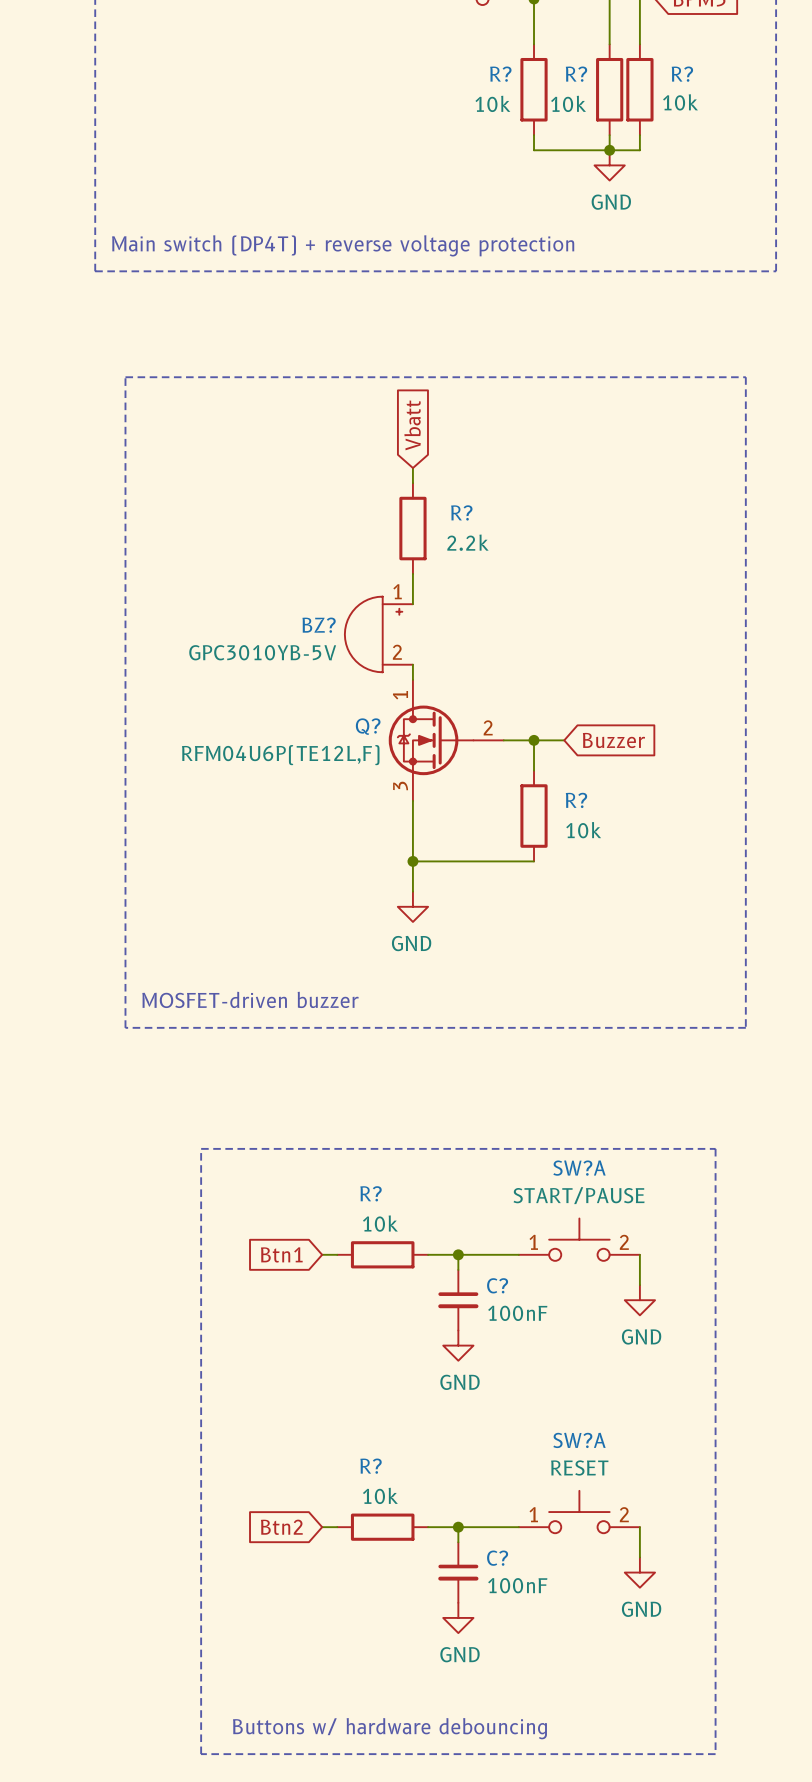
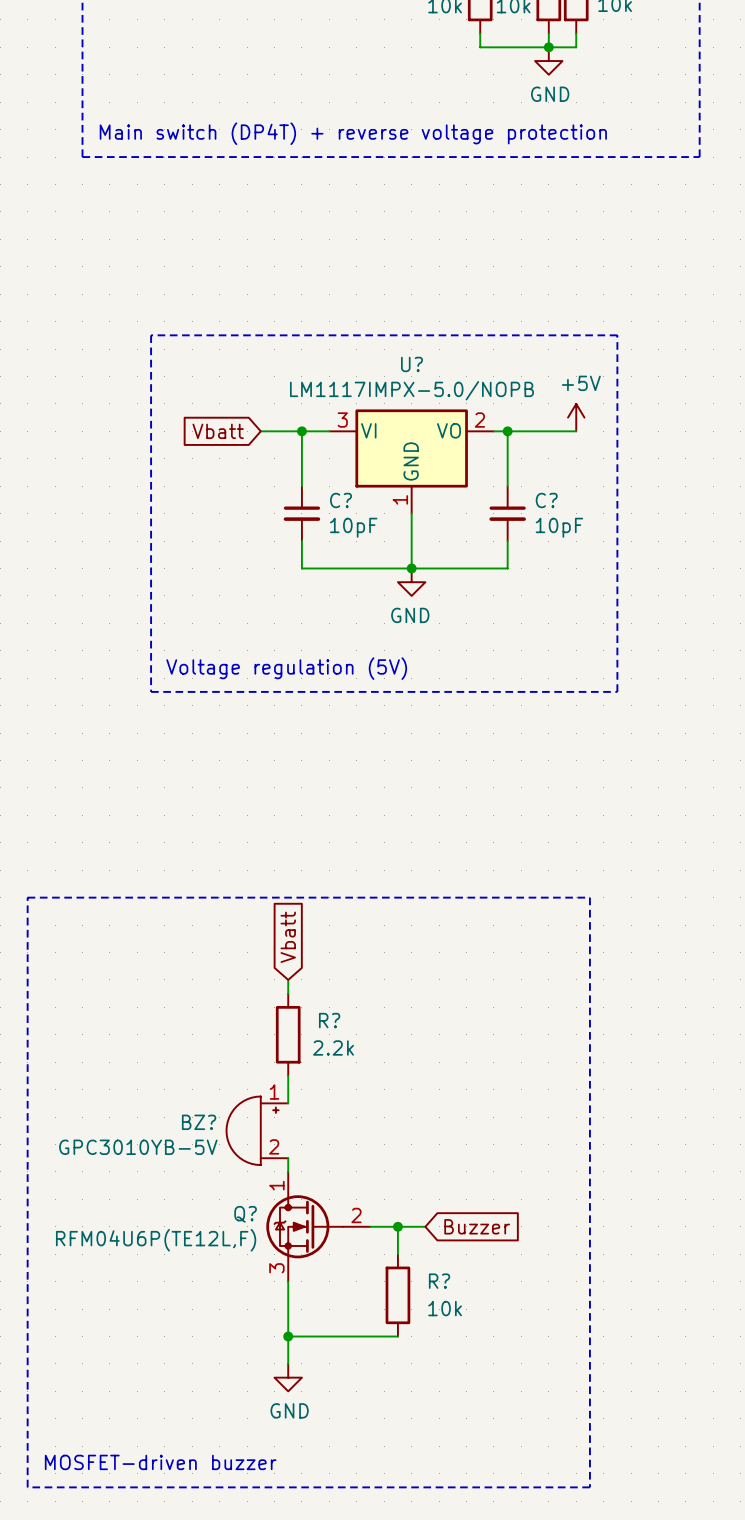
line: (125, 377) (125, 1027) (745, 1027) (745, 377) (125, 377) -> (151, 335) (151, 691) (617, 691) (617, 335) (151, 335)
global label rotation: 0° (412, 425) -> 90° counterclockwise (218, 431)
global label position: Vbatt (412, 425) -> Vbatt (218, 431)
wire: (412, 468) (412, 483) -> none
R?: 2.2k (412, 528) -> none
power symbol: none -> +5V (576, 417)
wire: none -> (260, 431) (329, 431)
wire: none -> (301, 431) (301, 486)
junction: none -> (301, 431)
wire: none -> (493, 431) (576, 431)
wire: none -> (507, 431) (507, 486)
junction: none -> (507, 431)
U?: none -> LM1117IMPX-5.0/NOPB (411, 461)
BZ?: GPC3010YB-5V (378, 634) -> none
C?: none -> 10pF (301, 513)
wire: (412, 664) (412, 679) -> none
wire: none -> (411, 513) (411, 568)
C?: none -> 10pF (507, 513)
wire: none -> (301, 541) (301, 568) (507, 568) (507, 541)
junction: none -> (411, 568)
Q?: RFM04U6P(TE12L,F) (446, 740) -> none
wire: (503, 740) (564, 740) -> none
wire: (534, 740) (534, 770) -> none
junction: (534, 740) -> none
global label: Buzzer (613, 740) -> none
wire: (412, 800) (412, 891) -> none
R?: 10k (534, 816) -> none
text: none -> Voltage regulation (5V) (286, 668)
junction: (412, 861) -> none
power symbol position: GND (412, 906) -> GND (411, 582)
text: MOSFET-driven buzzer (250, 999) -> none
global label: none -> Vbatt (288, 937)
line: (201, 1148) (201, 1754) (715, 1754) (715, 1148) (201, 1148) -> (27, 897) (27, 1487) (589, 1487) (589, 897) (27, 897)
R?: none -> 2.2k (288, 1034)
SW?A: START/PAUSE (579, 1239) -> none
global label: Btn1 (281, 1254) -> none
wire: (322, 1254) (337, 1254) -> none
R?: 10k (382, 1254) -> none
wire: (428, 1254) (518, 1254) -> none
wire: (458, 1254) (458, 1269) -> (288, 979) (288, 993)
junction: (458, 1254) -> none
wire: (639, 1254) (639, 1285) -> none
wire: none -> (288, 1075) (288, 1103)
C?: 100nF (458, 1300) -> none
power symbol: GND (639, 1300) -> none
BZ?: none -> GPC3010YB-5V (257, 1130)
power symbol: GND (458, 1345) -> none
Q?: none -> RFM04U6P(TE12L,F) (318, 1226)
wire: none -> (370, 1226) (425, 1226)
junction: none -> (397, 1226)
global label: none -> Buzzer (477, 1226)
R? value position: 10k (380, 1495) -> 10k (445, 1308)
wire: none -> (288, 1281) (288, 1363)
SW?A: RESET (579, 1512) -> none
global label: Btn2 (281, 1527) -> none
wire: (322, 1527) (337, 1527) -> none
R? rotation: 0° (382, 1527) -> 90° clockwise (397, 1295)
R? position: (382, 1527) -> (397, 1295)
wire: (428, 1527) (518, 1527) -> none
wire: (458, 1527) (458, 1542) -> (288, 1158) (288, 1171)
junction: (458, 1527) -> none
wire: (639, 1527) (639, 1557) -> (397, 1226) (397, 1254)
wire: none -> (288, 1336) (397, 1336)
junction: none -> (288, 1336)
C?: 100nF (458, 1572) -> none
power symbol: GND (639, 1572) -> none
power symbol position: GND (458, 1617) -> GND (288, 1377)
text: none -> MOSFET-driven buzzer (160, 1462)
text: Buttons w/ hardware debouncing (389, 1728) -> none

